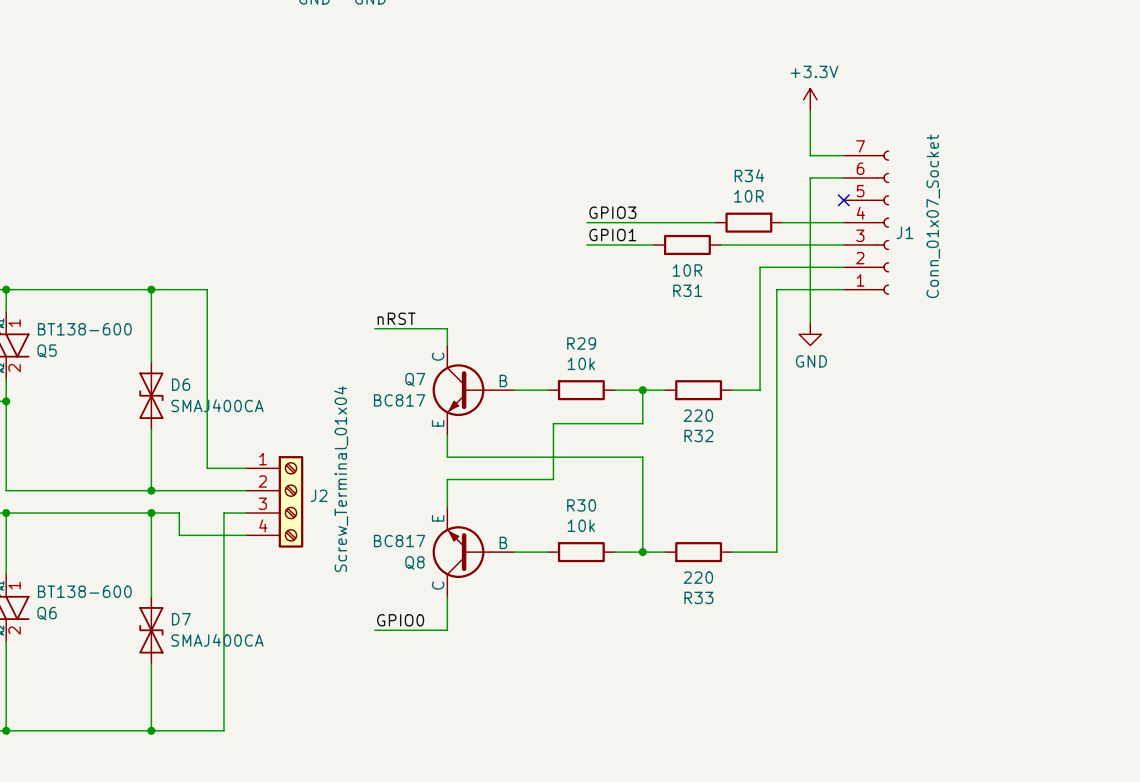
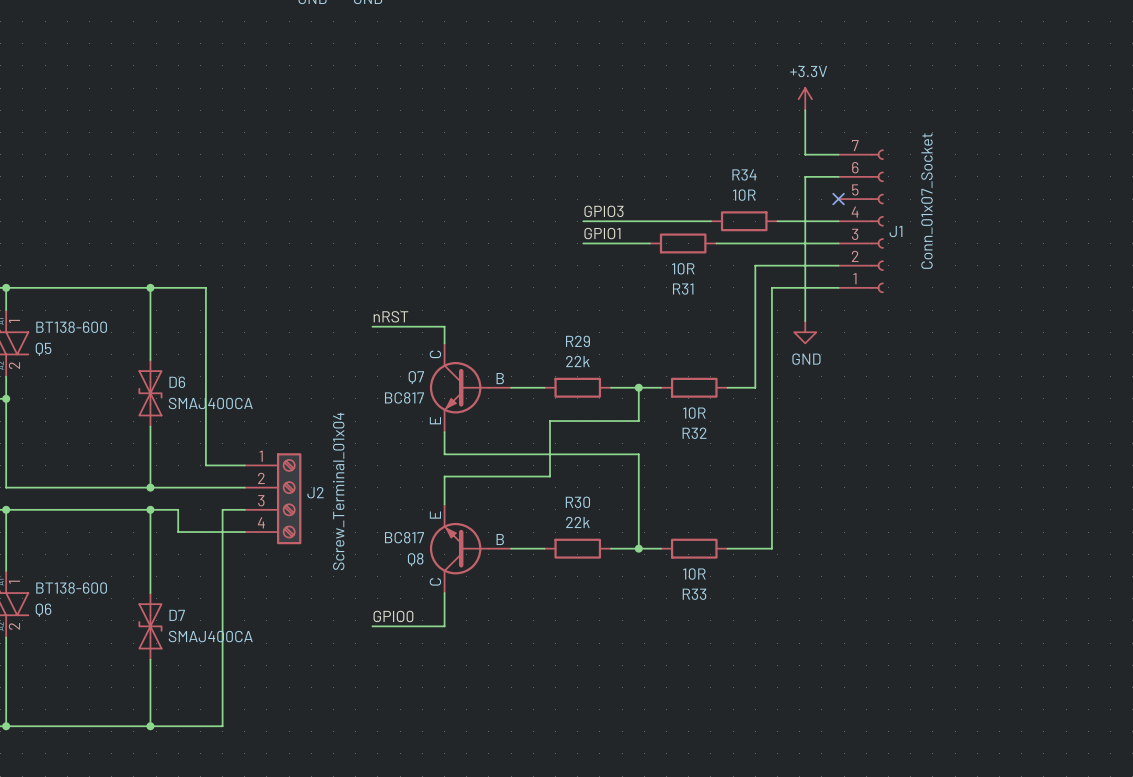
R29 value: 10k (581, 363) -> 22k (577, 361)
R32 value: 220 (698, 415) -> 10R (694, 413)
R30 value: 10k (581, 525) -> 22k (577, 522)
R33 value: 220 (698, 577) -> 10R (694, 574)

